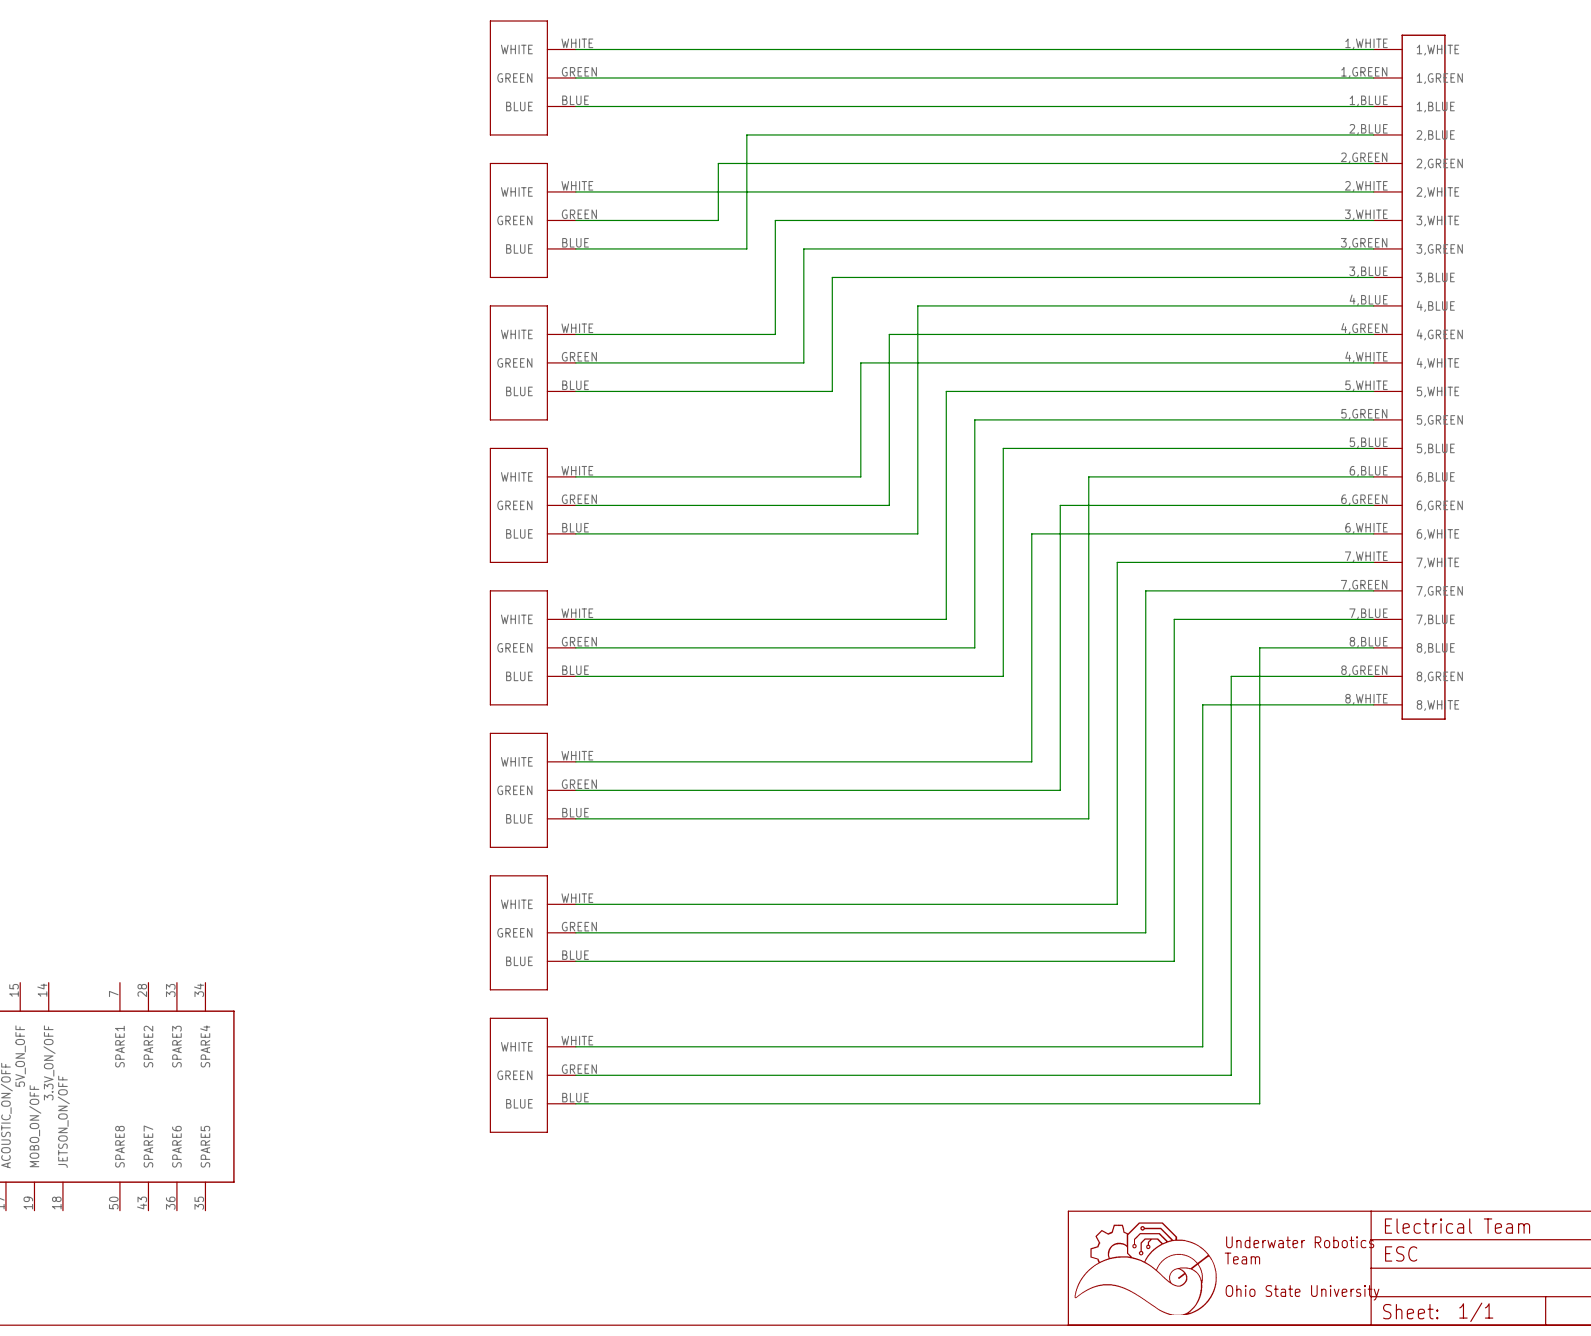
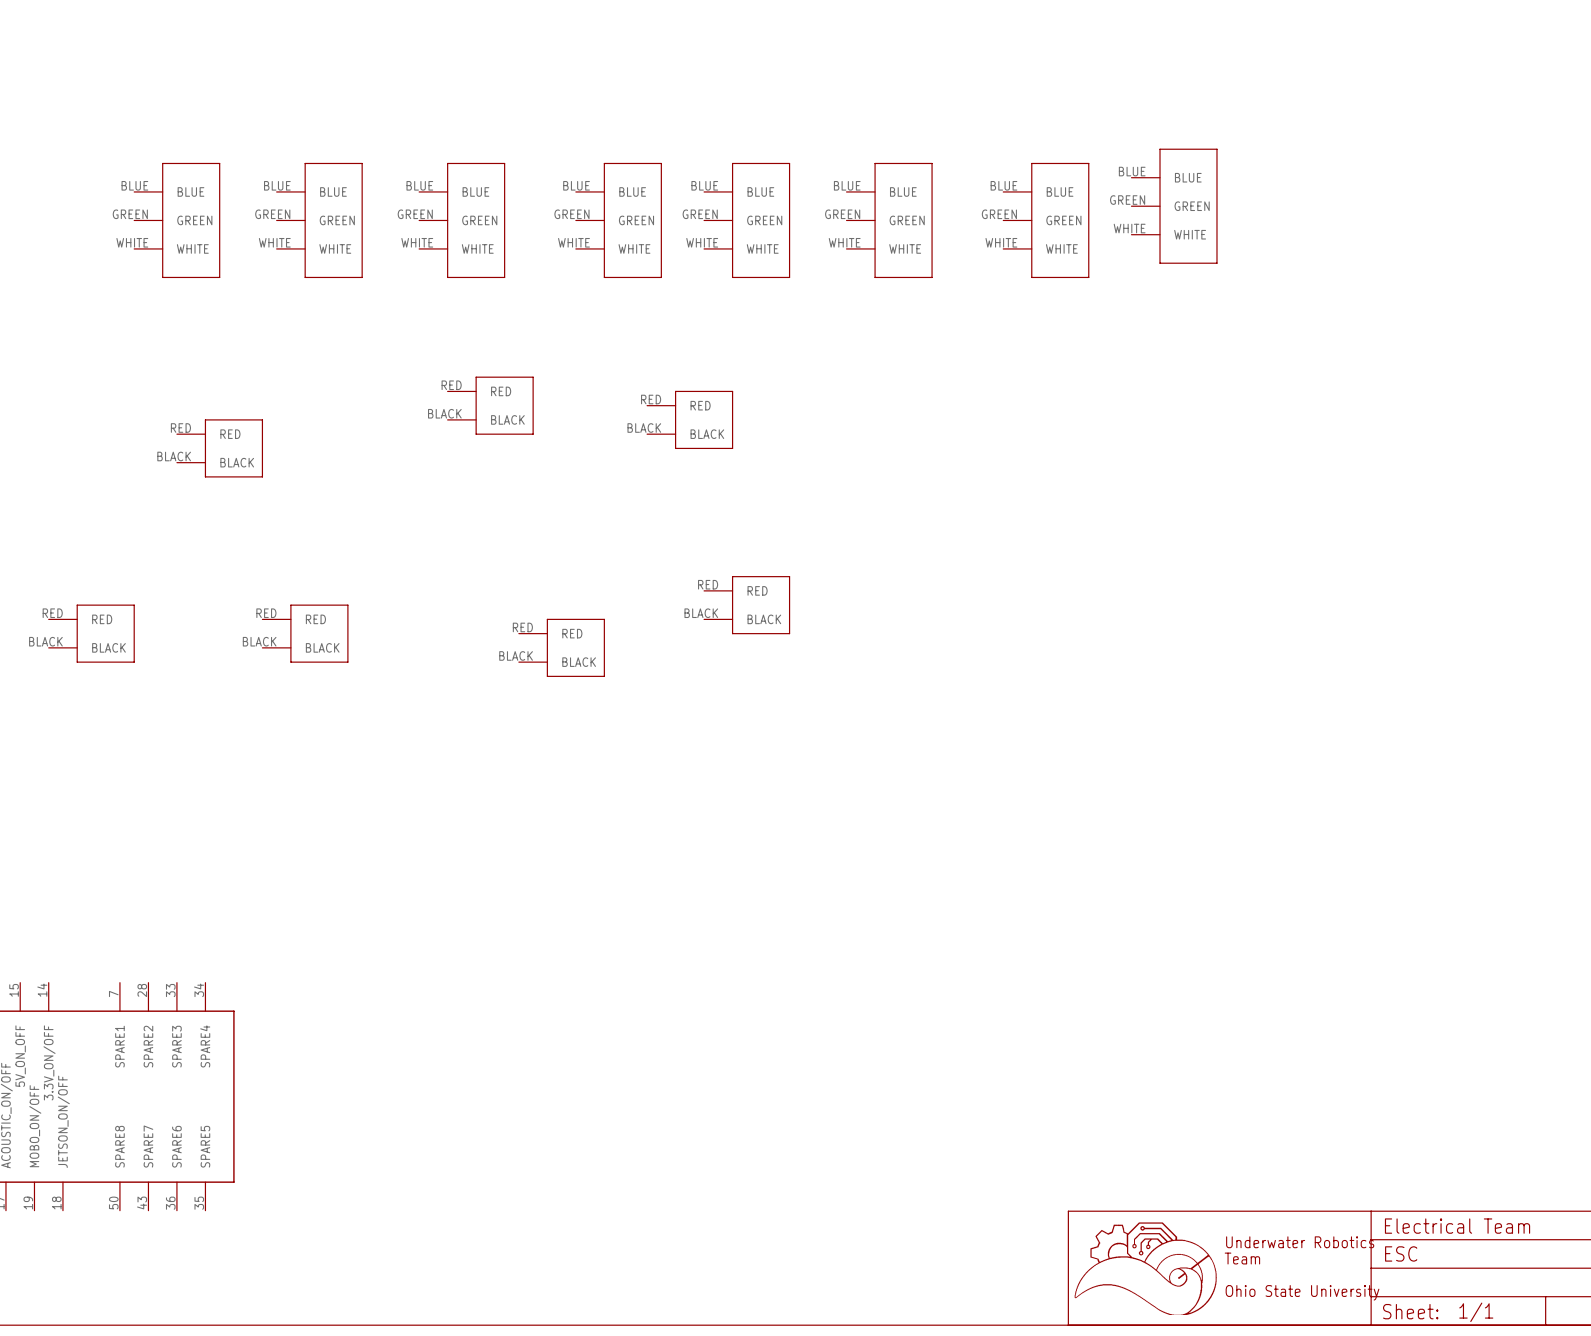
wire: (575, 49) (1373, 49) -> none
part: (532, 77) -> none
wire: (575, 77) (1373, 77) -> none
wire: (575, 106) (1373, 106) -> none
wire: (1373, 134) (746, 134) (746, 248) (575, 248) -> none
wire: (1373, 163) (718, 163) (718, 220) (575, 220) -> none
wire: (575, 191) (1373, 191) -> none
part: none -> (1174, 206)
part: none -> (177, 220)
part: none -> (319, 220)
part: none -> (462, 220)
part: (532, 220) -> none
part: none -> (618, 220)
part: none -> (747, 220)
part: none -> (889, 220)
part: none -> (1046, 220)
wire: (1373, 220) (775, 220) (775, 334) (575, 334) -> none
wire: (1373, 248) (803, 248) (803, 362) (575, 362) -> none
wire: (1373, 277) (832, 277) (832, 391) (575, 391) -> none
wire: (1373, 305) (917, 305) (917, 533) (575, 533) -> none
wire: (1373, 334) (889, 334) (889, 505) (575, 505) -> none
part: (532, 362) -> none
wire: (1373, 362) (860, 362) (860, 476) (575, 476) -> none
part: (1409, 377) -> none
wire: (1373, 391) (946, 391) (946, 619) (575, 619) -> none
part: none -> (490, 405)
part: none -> (690, 419)
wire: (1373, 419) (974, 419) (974, 647) (575, 647) -> none
part: none -> (219, 448)
wire: (1373, 448) (1003, 448) (1003, 676) (575, 676) -> none
wire: (1373, 476) (1088, 476) (1088, 818) (575, 818) -> none
part: (532, 505) -> none
wire: (1373, 505) (1060, 505) (1060, 790) (575, 790) -> none
wire: (1373, 533) (1031, 533) (1031, 761) (575, 761) -> none
wire: (1373, 562) (1117, 562) (1117, 904) (575, 904) -> none
wire: (1373, 590) (1145, 590) (1145, 932) (575, 932) -> none
part: none -> (747, 605)
wire: (1373, 619) (1174, 619) (1174, 961) (575, 961) -> none
part: none -> (91, 633)
part: none -> (305, 633)
part: (532, 647) -> none
part: none -> (561, 647)
wire: (1373, 647) (1259, 647) (1259, 1103) (575, 1103) -> none
wire: (1373, 676) (1231, 676) (1231, 1075) (575, 1075) -> none
wire: (1373, 704) (1202, 704) (1202, 1046) (575, 1046) -> none
part: (532, 790) -> none
part: (532, 932) -> none
part: (532, 1075) -> none

